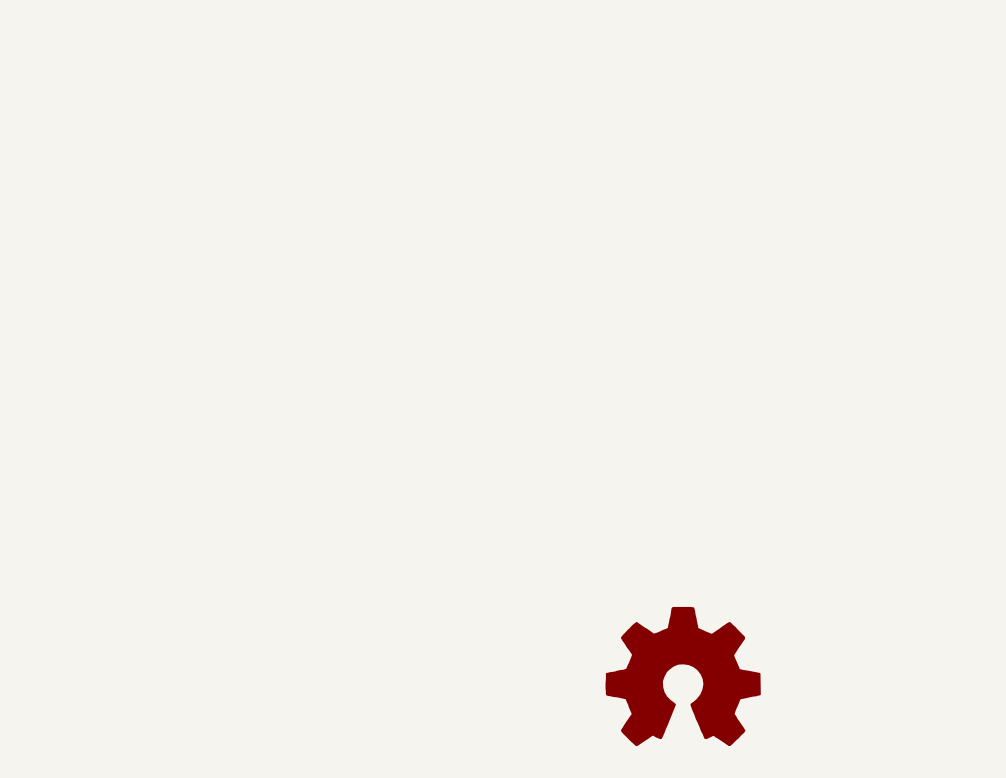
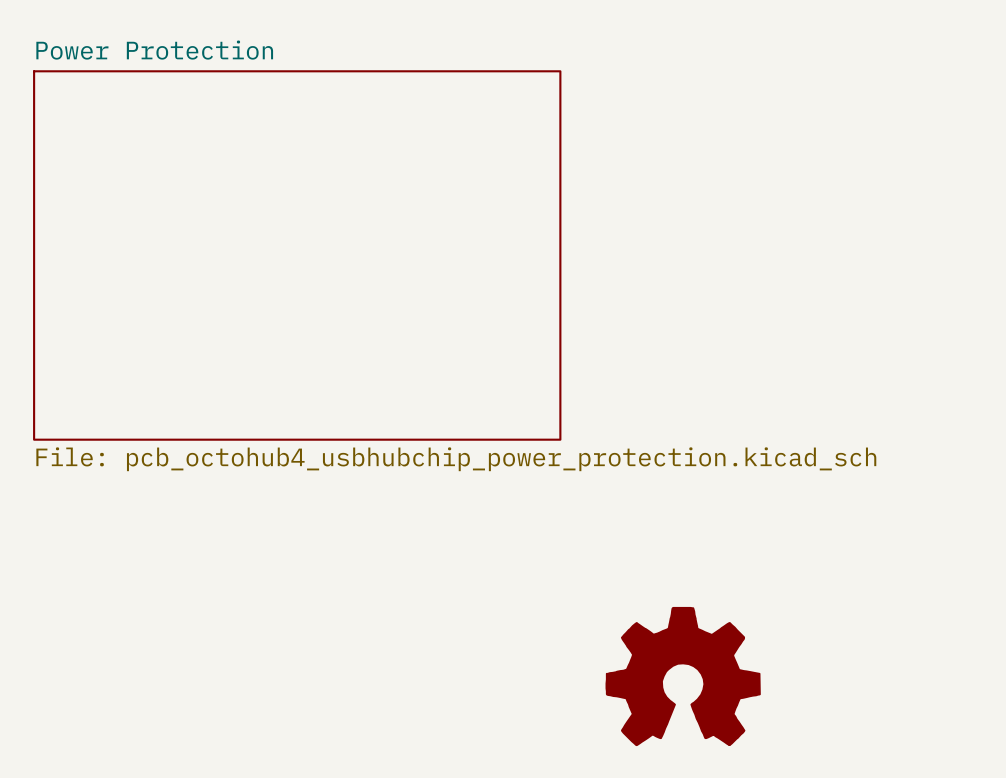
sheet Power Protection: none -> File: pcb_octohub4_usbhubchip_power_protection.kicad_sch (297, 255)

